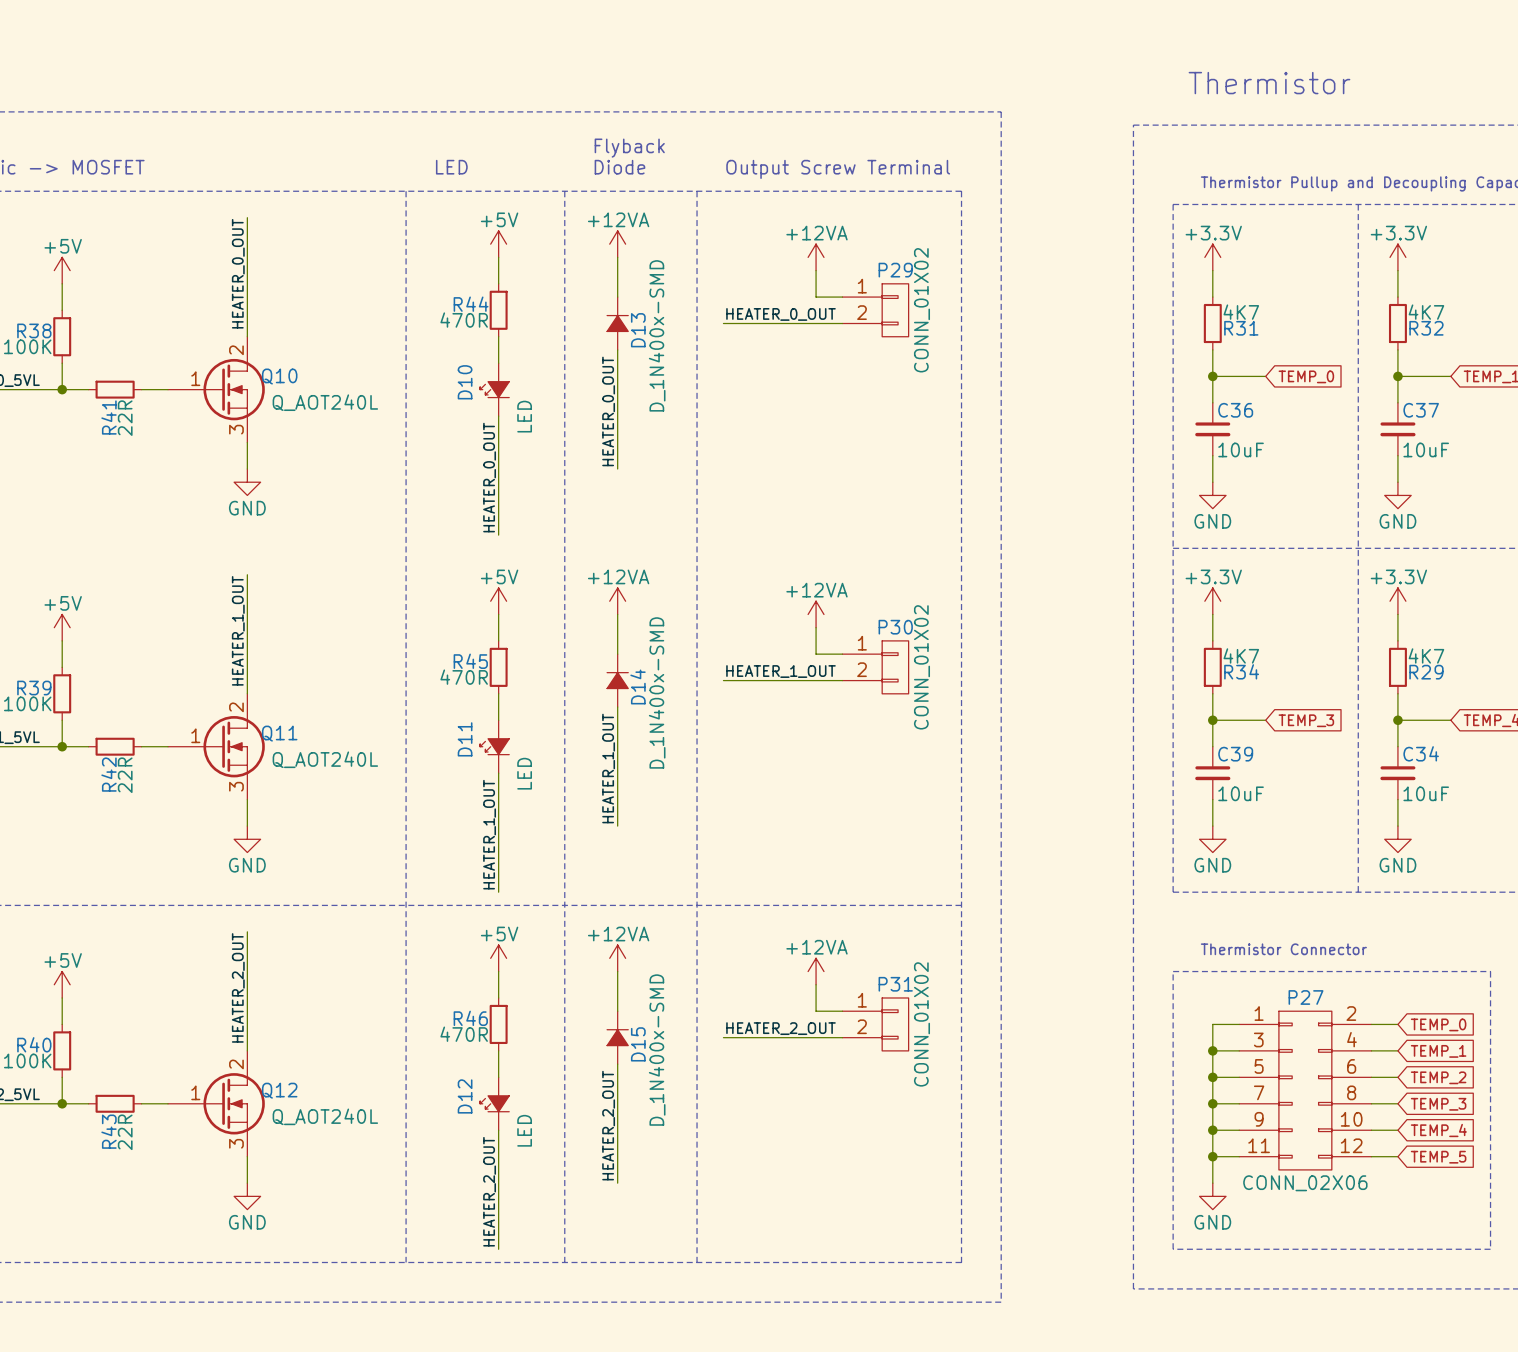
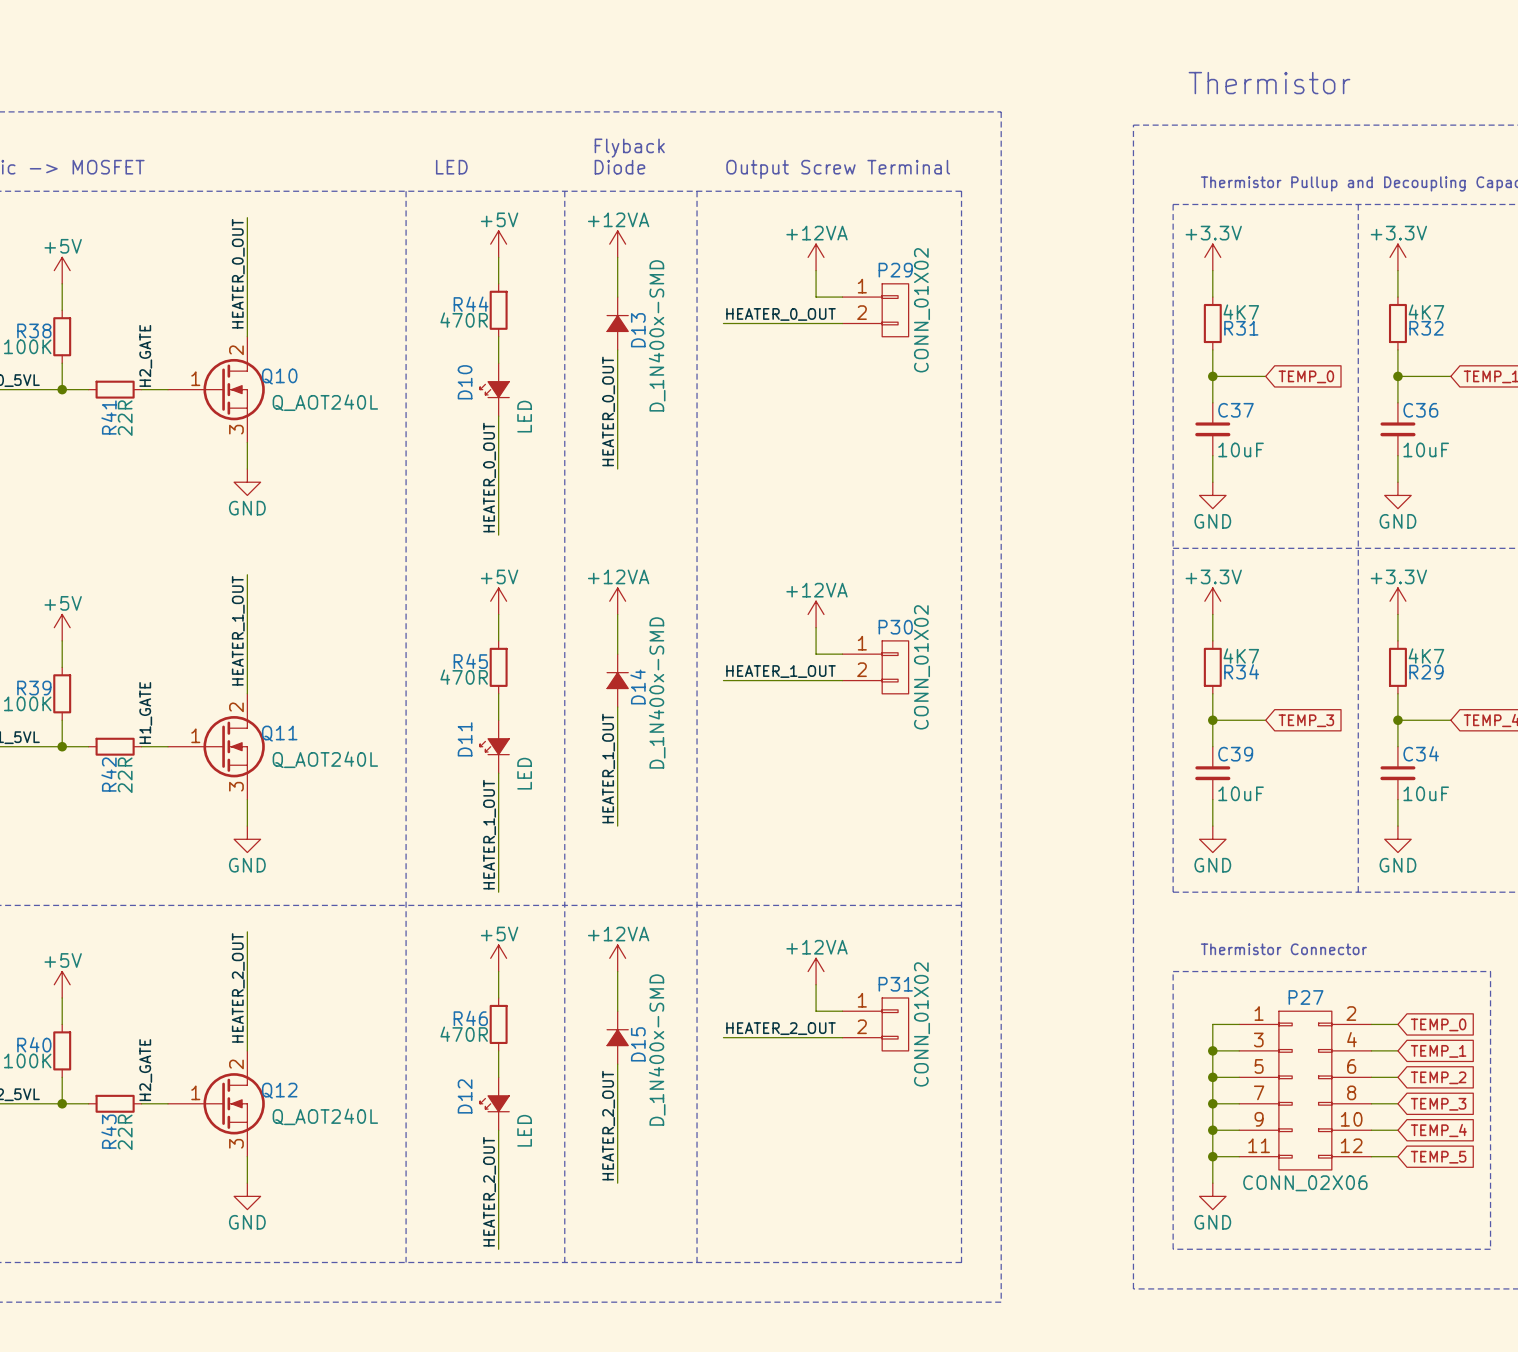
label: none -> H2_GATE (145, 355)
C36 name: C36 (1235, 410) -> C37 (1236, 410)
C37 name: C37 (1421, 410) -> C36 (1420, 410)
label: none -> H1_GATE (145, 713)
label: none -> H2_GATE (145, 1070)

